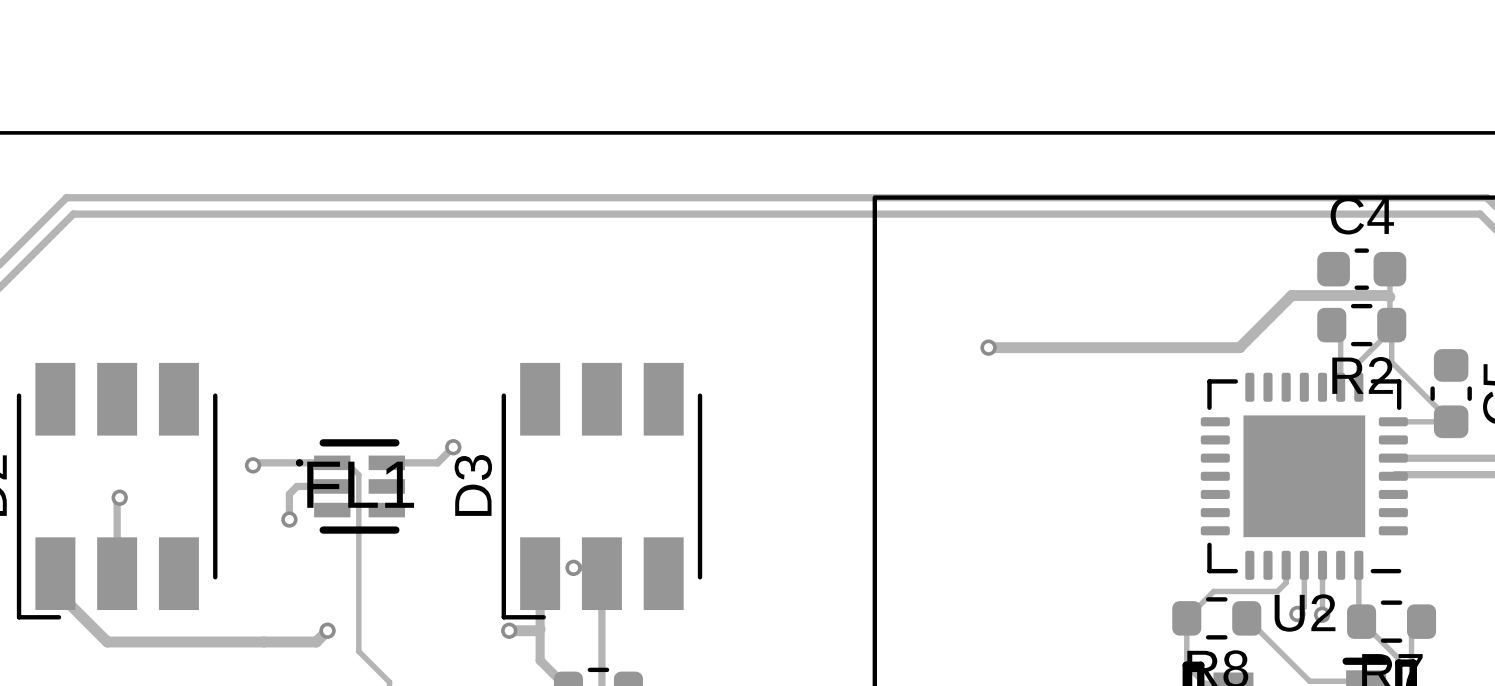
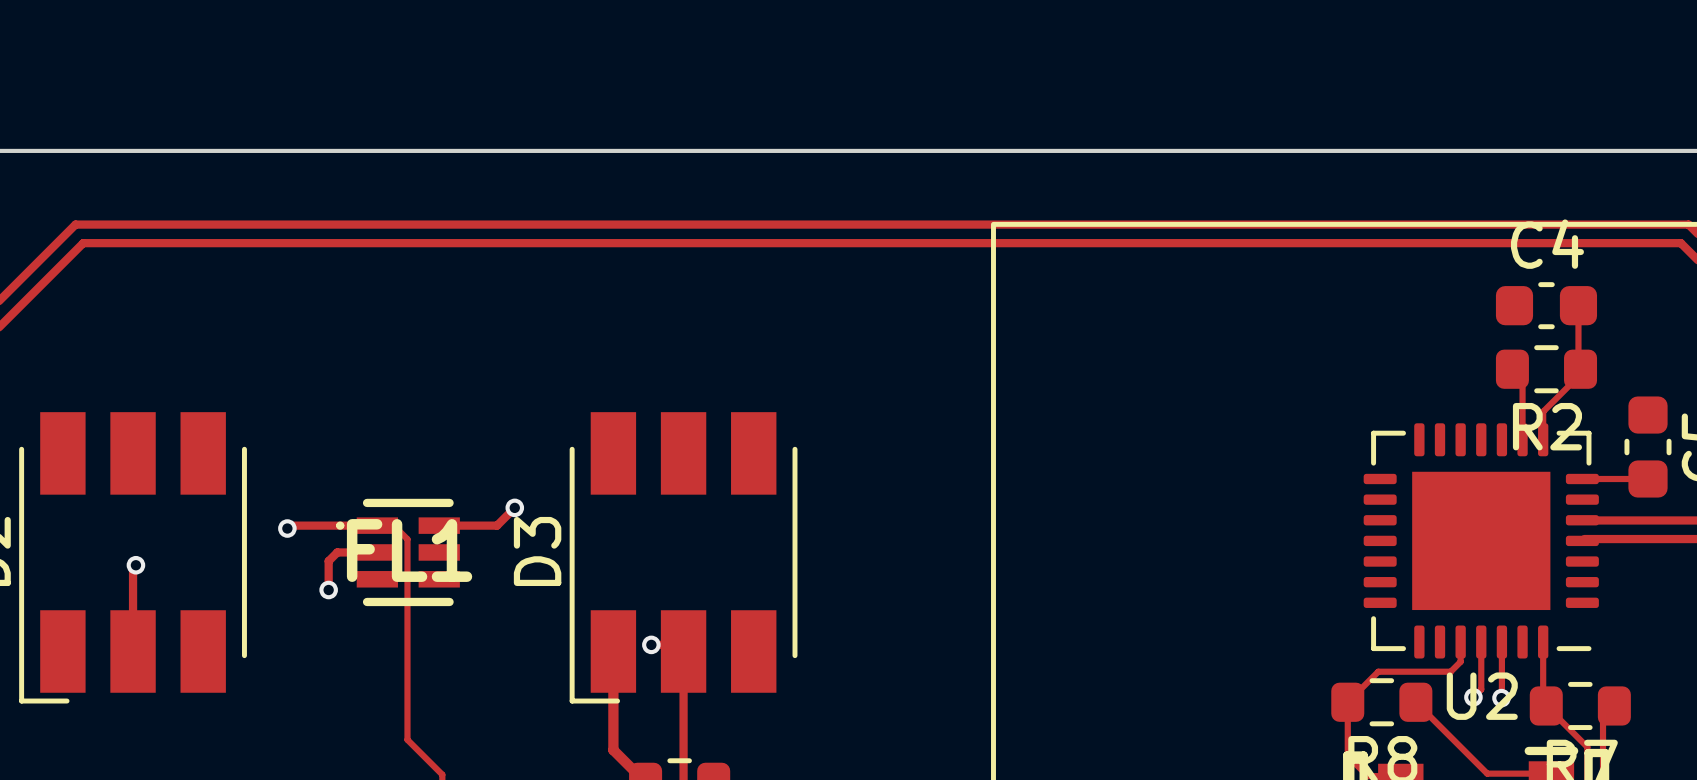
track: (1389, 297) (1388, 295) (1291, 295) (1239, 347) (988, 347) -> none
track: (1391, 329) (1391, 362) (1451, 421) -> none
via: (988, 347) -> none
track: (55, 573) (55, 590) (107, 641) (316, 641) (327, 630) -> none
track: (540, 629) (509, 630) -> none
via: (327, 630) -> none
via: (509, 630) -> none

